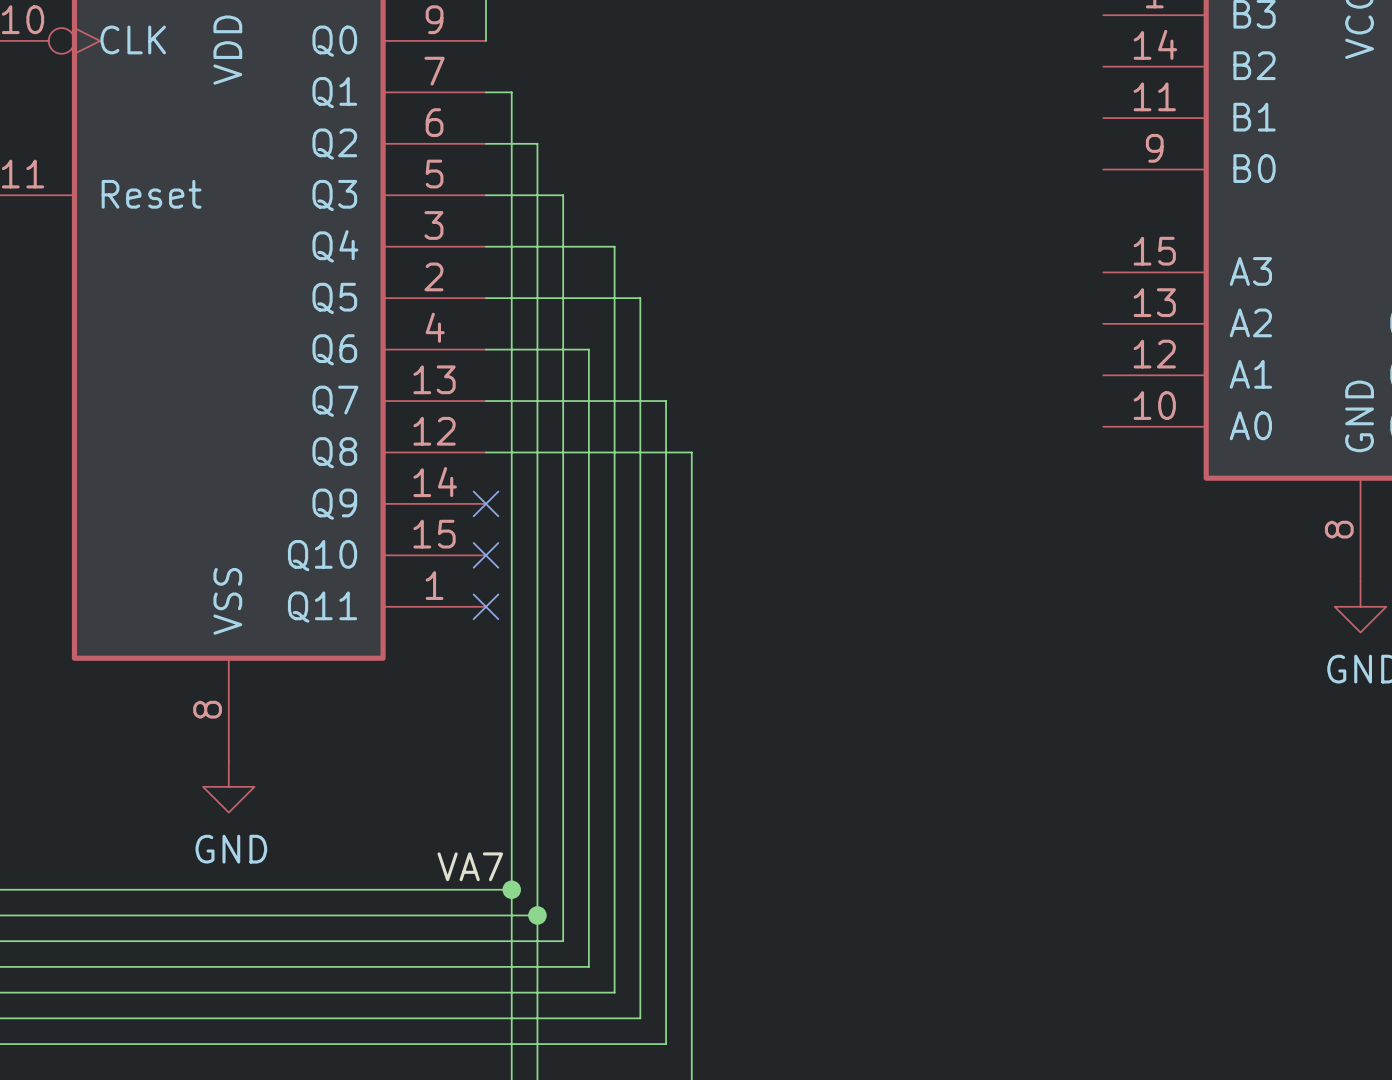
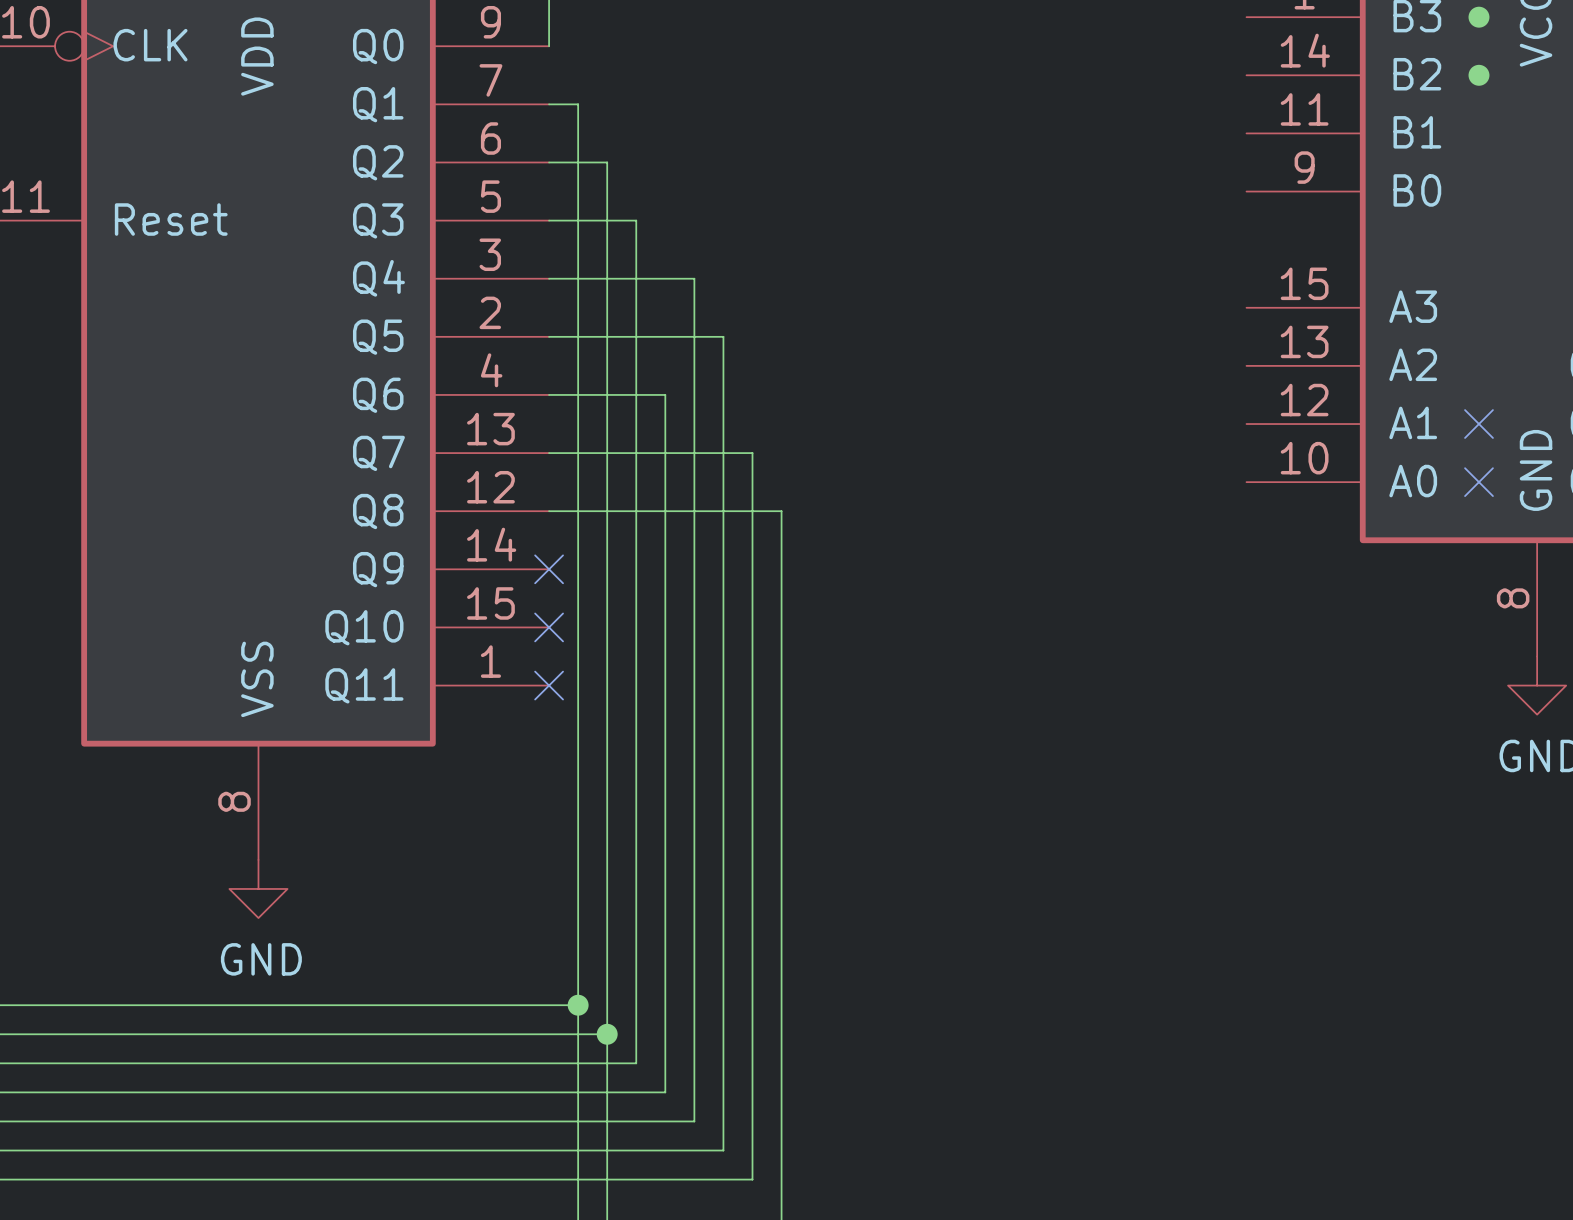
junction: none -> (1478, 17)
junction: none -> (1478, 75)
no-connect mark: none -> (1478, 424)
no-connect mark: none -> (1478, 482)
label: VA7 (470, 866) -> none

